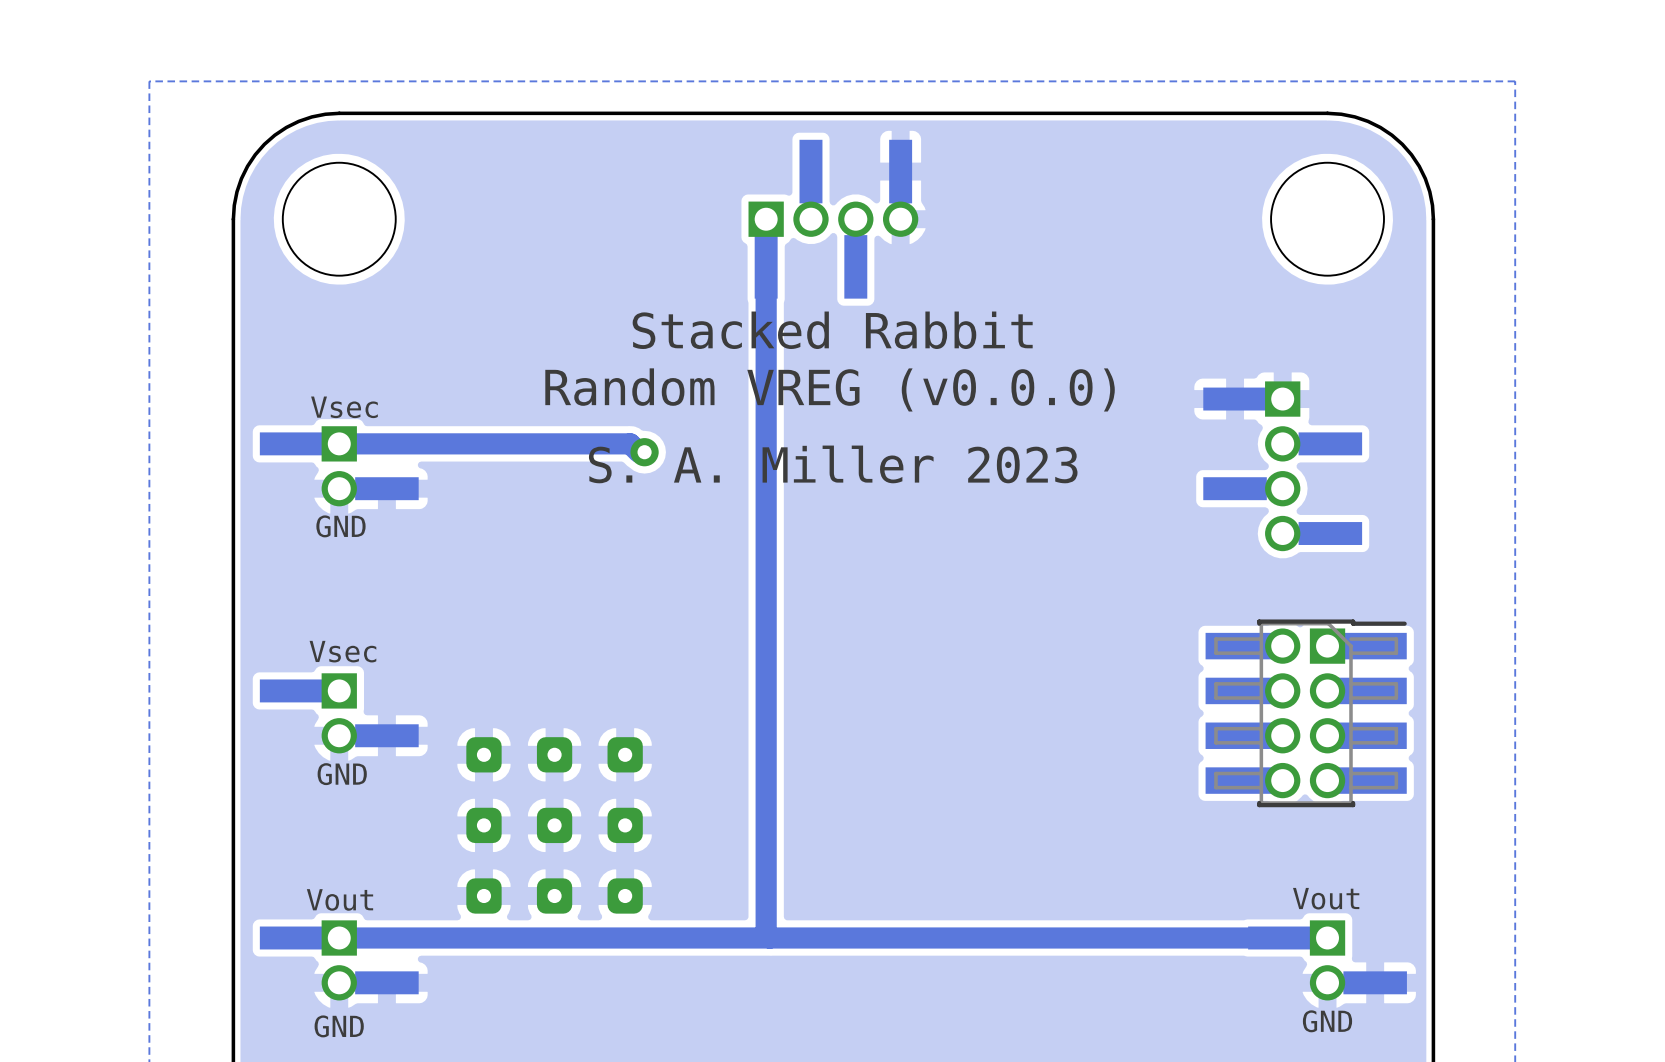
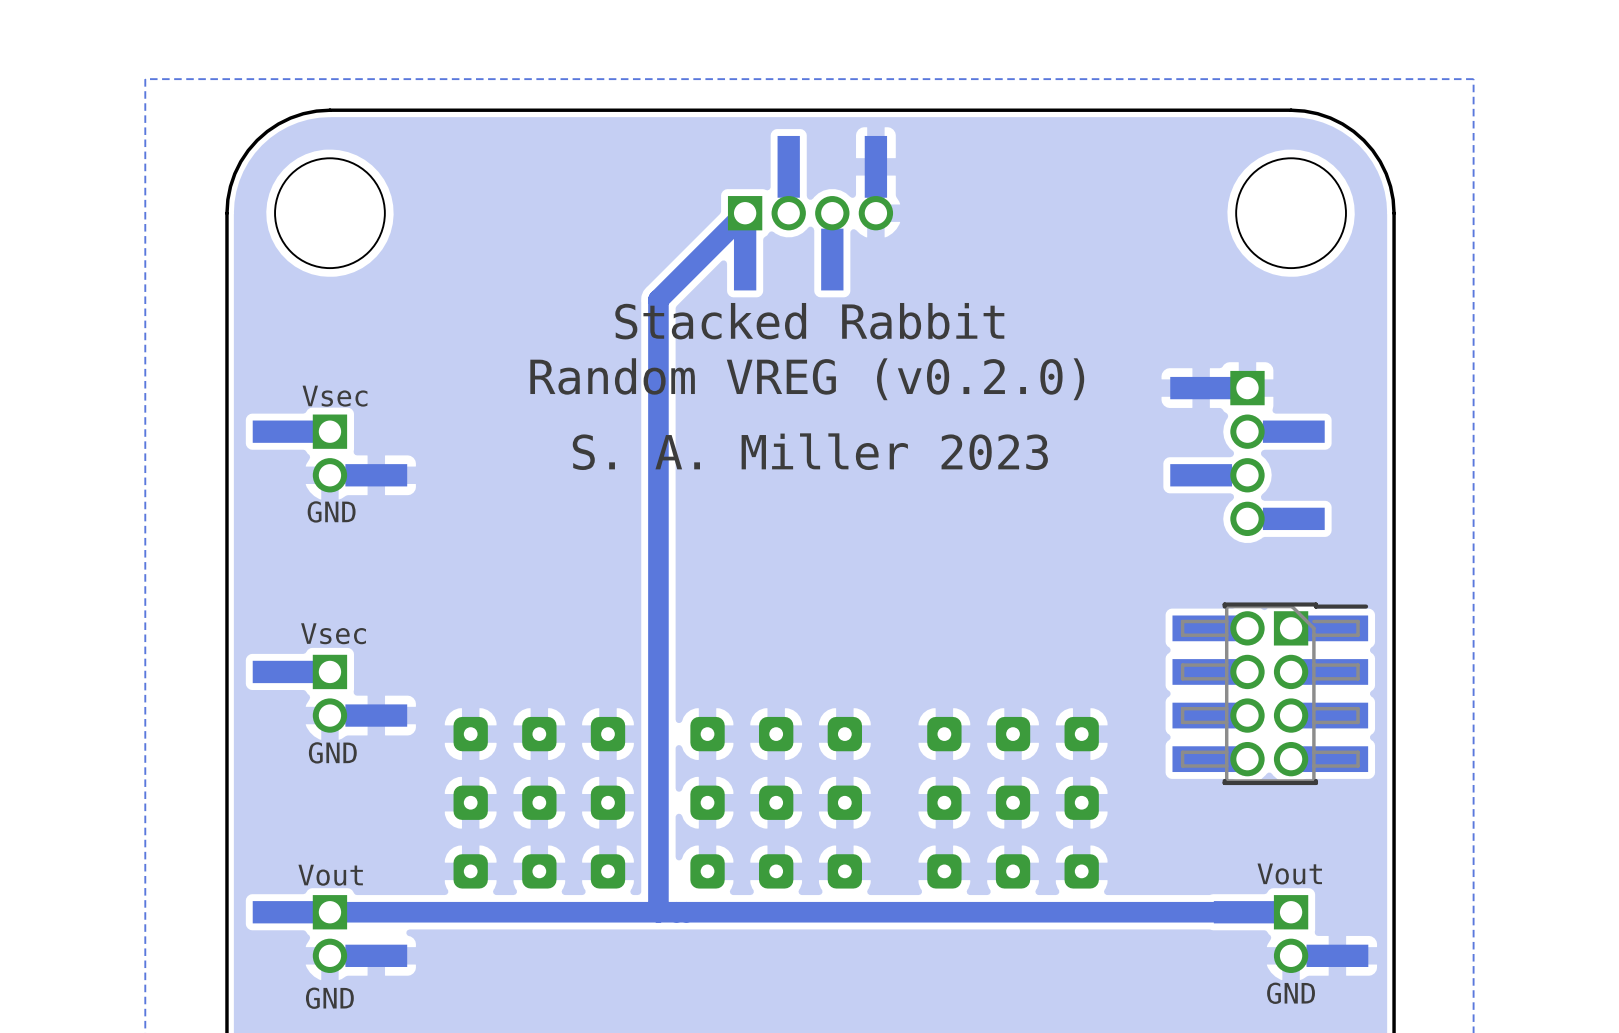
track: (766, 219) (766, 934) (769, 937) -> (745, 213) (658, 299) (658, 912)
text: Random VREG (v0.0.0) (830, 389) -> Random VREG (v0.2.0) (807, 379)
track: (339, 443) (630, 443) (638, 452) -> none
via: (644, 452) -> none
part: none -> (776, 802)
part: none -> (1013, 802)

